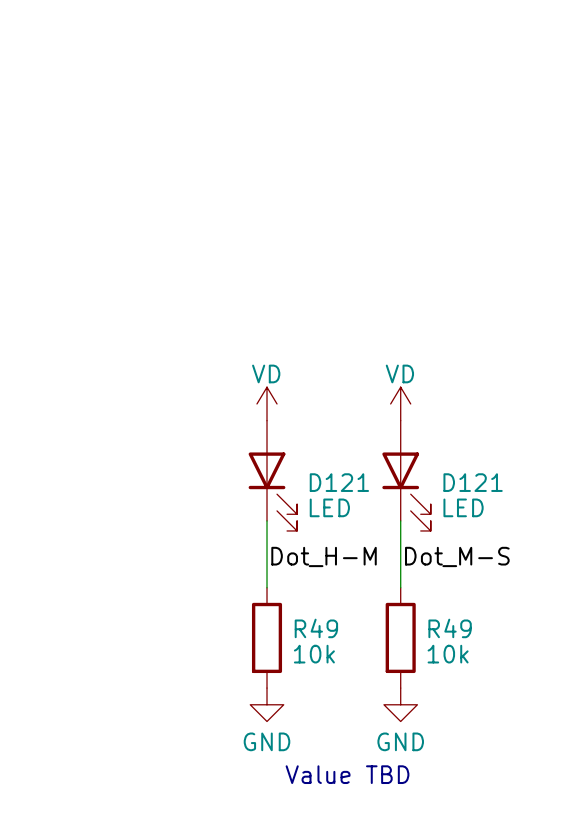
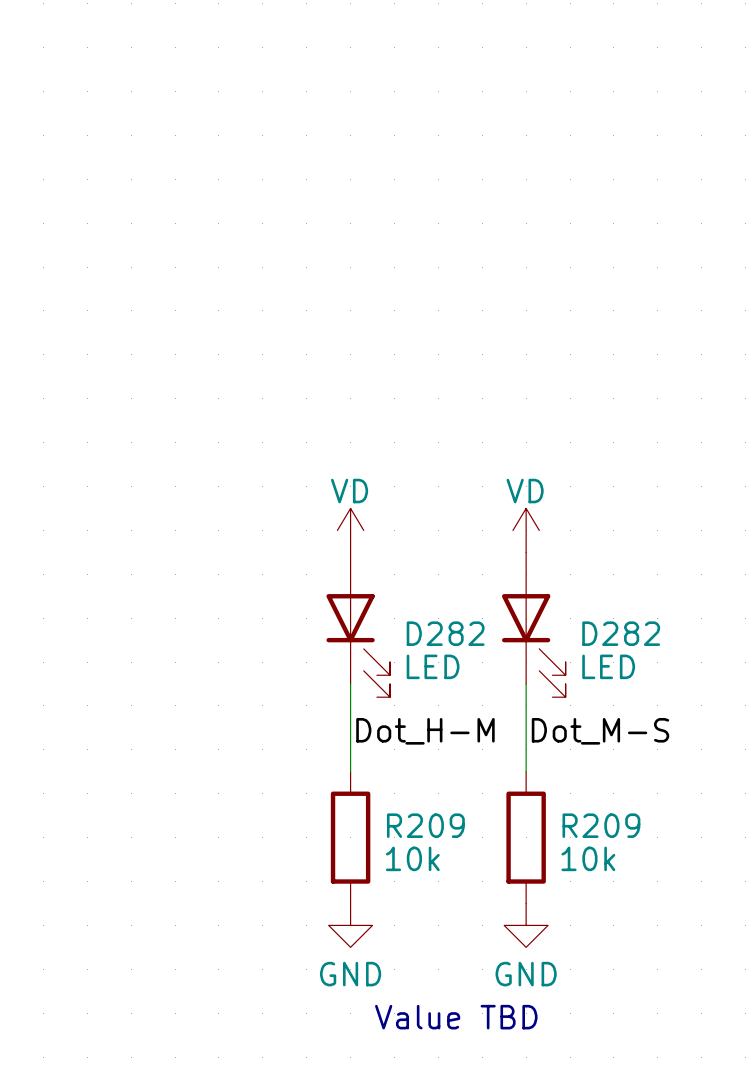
D121 name: D121 (339, 482) -> D282 (445, 633)
D121 name: D121 (473, 482) -> D282 (621, 633)
R49 name: R49 (316, 628) -> R209 (425, 825)
R49 name: R49 (450, 628) -> R209 (601, 825)

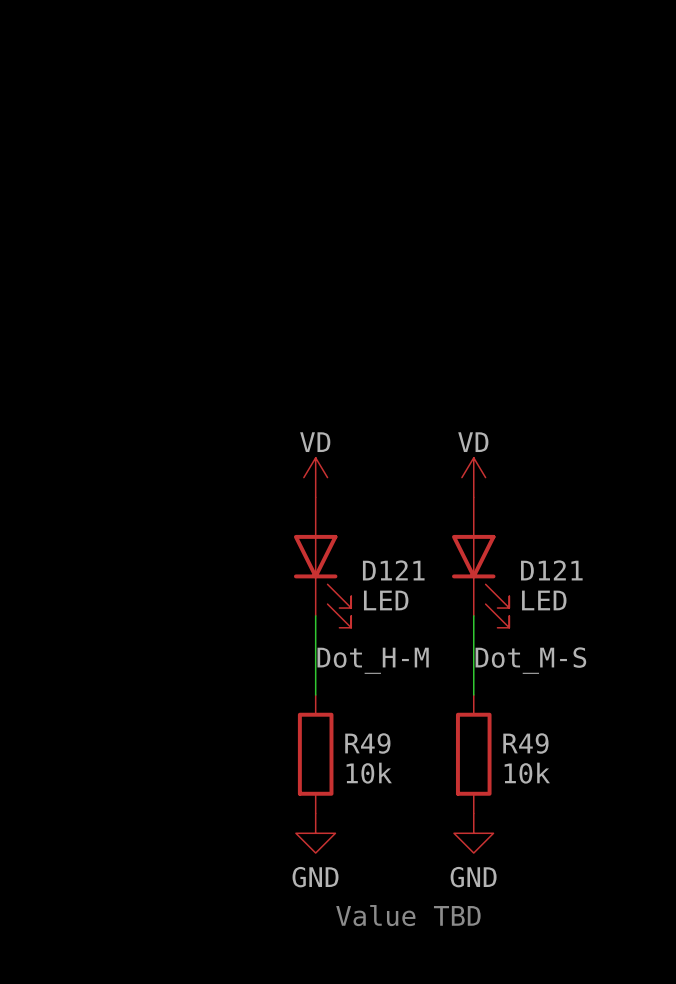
D282 name: D282 (445, 633) -> D121 (393, 570)
D282 name: D282 (621, 633) -> D121 (551, 570)
R209 name: R209 (425, 825) -> R49 (367, 743)
R209 name: R209 (601, 825) -> R49 (525, 743)

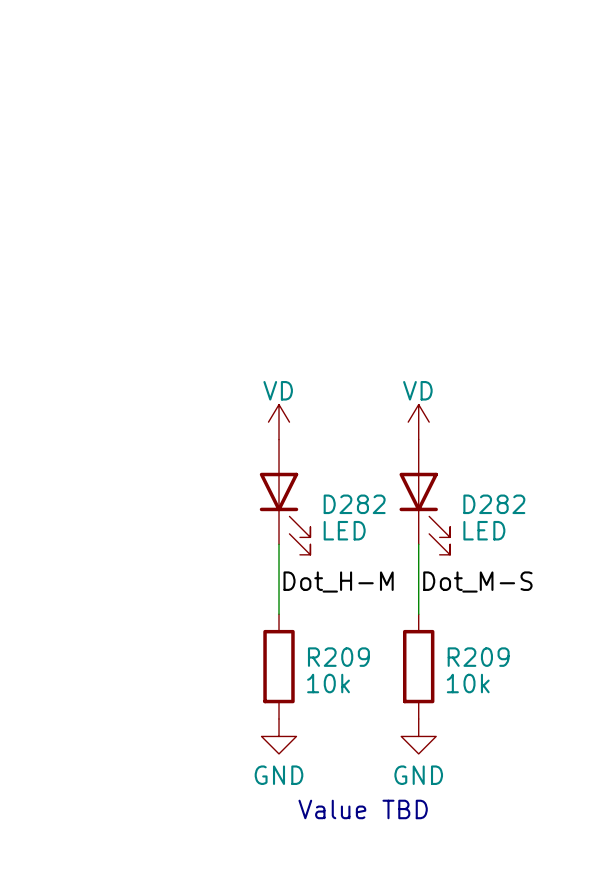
D121 name: D121 (393, 570) -> D282 (354, 504)
D121 name: D121 (551, 570) -> D282 (494, 504)
R49 name: R49 (367, 743) -> R209 (338, 657)
R49 name: R49 (525, 743) -> R209 (478, 657)

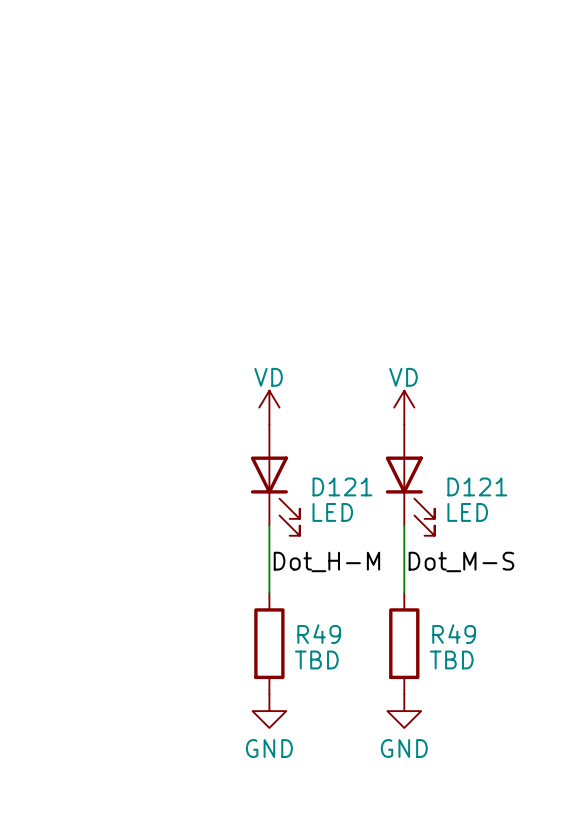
D282 name: D282 (354, 504) -> D121 (342, 486)
D282 name: D282 (494, 504) -> D121 (477, 486)
R209 name: R209 (338, 657) -> R49 (319, 634)
R209 name: R209 (478, 657) -> R49 (454, 634)
R209 value: 10k (328, 683) -> TBD (316, 659)
R209 value: 10k (468, 683) -> TBD (451, 659)
text: Value TBD (363, 809) -> none

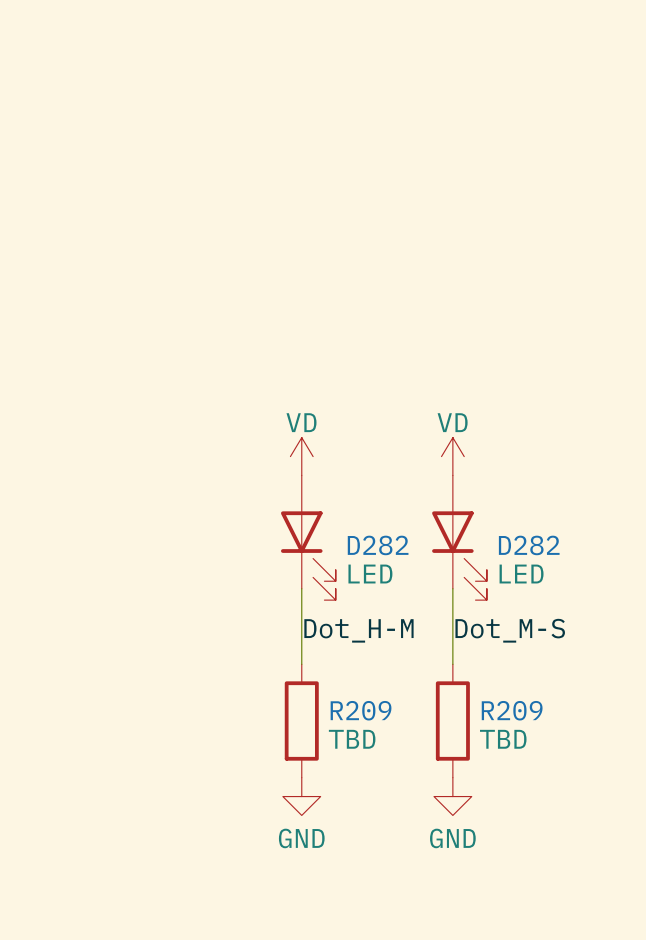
D121 name: D121 (342, 486) -> D282 (378, 545)
D121 name: D121 (477, 486) -> D282 (529, 545)
R49 name: R49 (319, 634) -> R209 (361, 710)
R49 name: R49 (454, 634) -> R209 (512, 710)

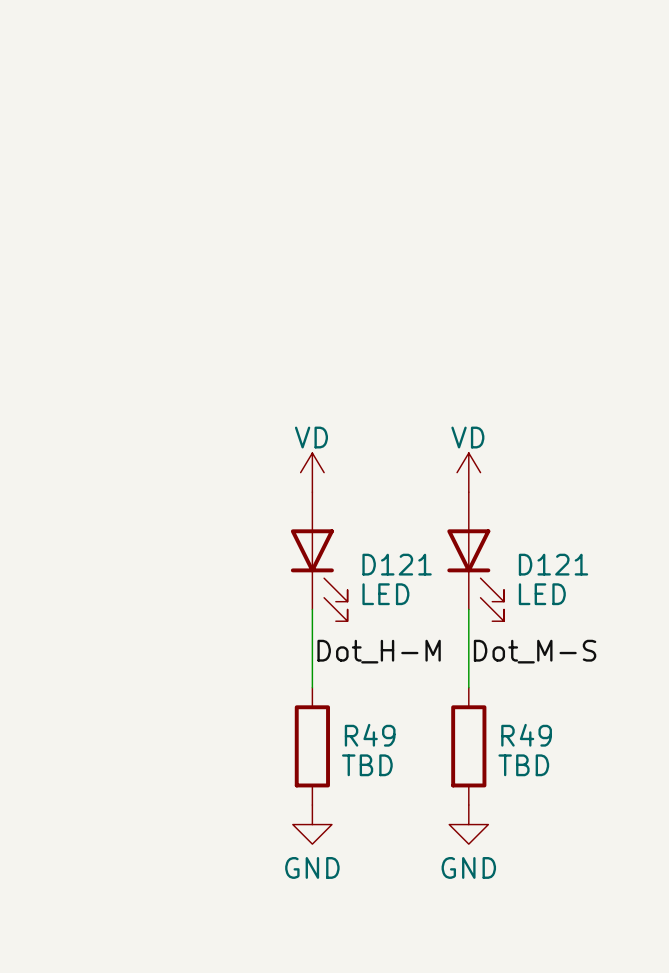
D282 name: D282 (378, 545) -> D121 (397, 564)
D282 name: D282 (529, 545) -> D121 (553, 564)
R209 name: R209 (361, 710) -> R49 (370, 735)
R209 name: R209 (512, 710) -> R49 (526, 735)

